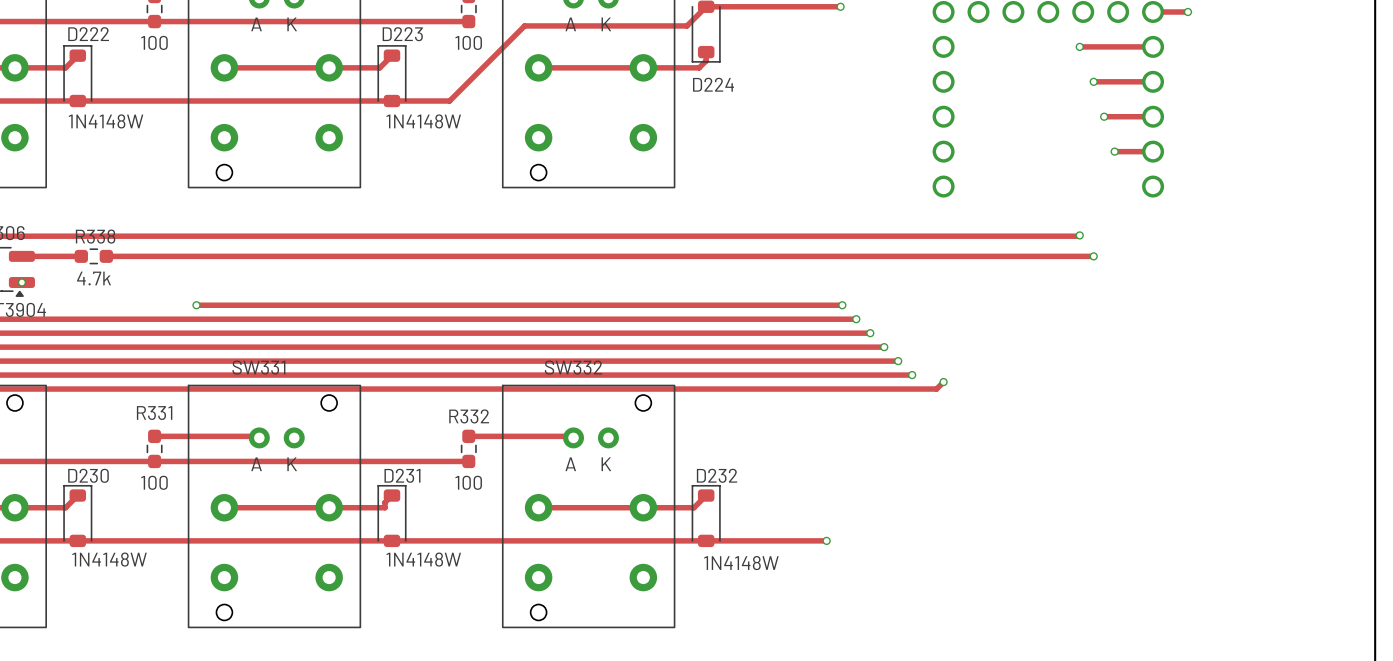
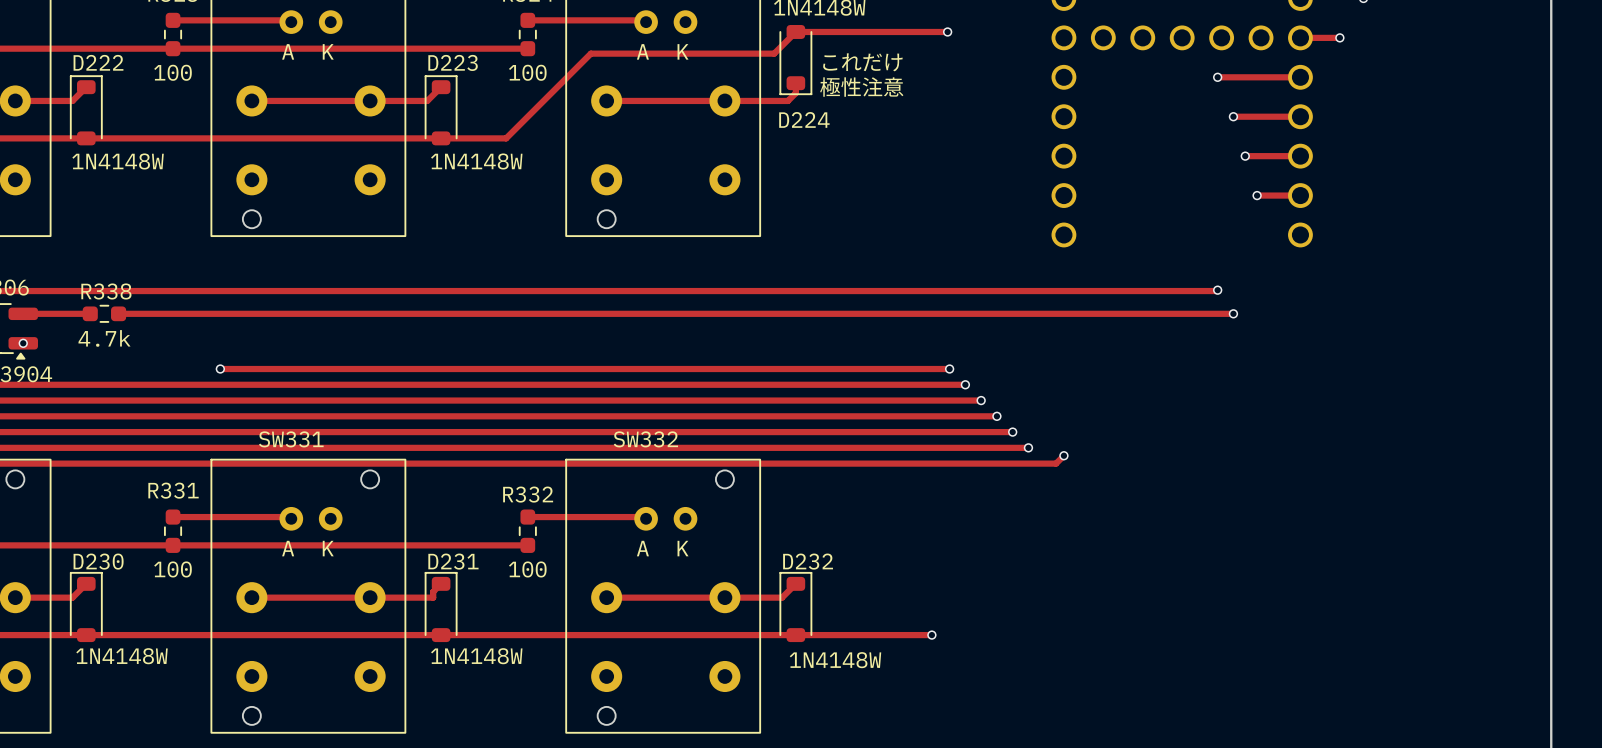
text: none -> これだけ (862, 62)
text: none -> 極性注意 (861, 87)

